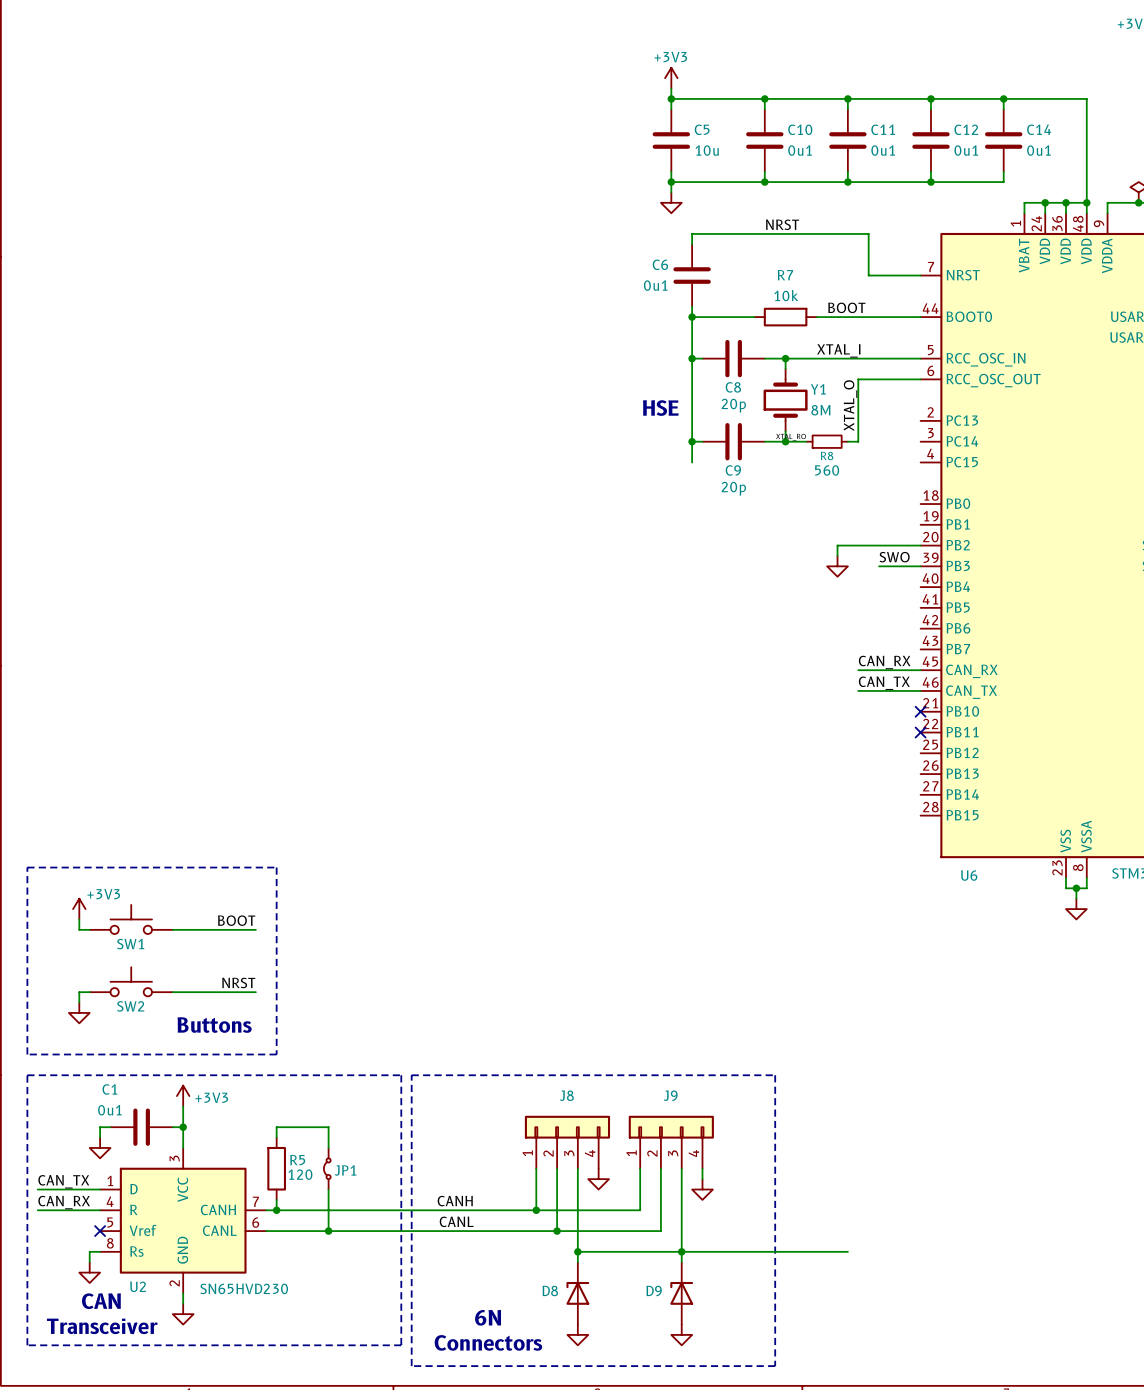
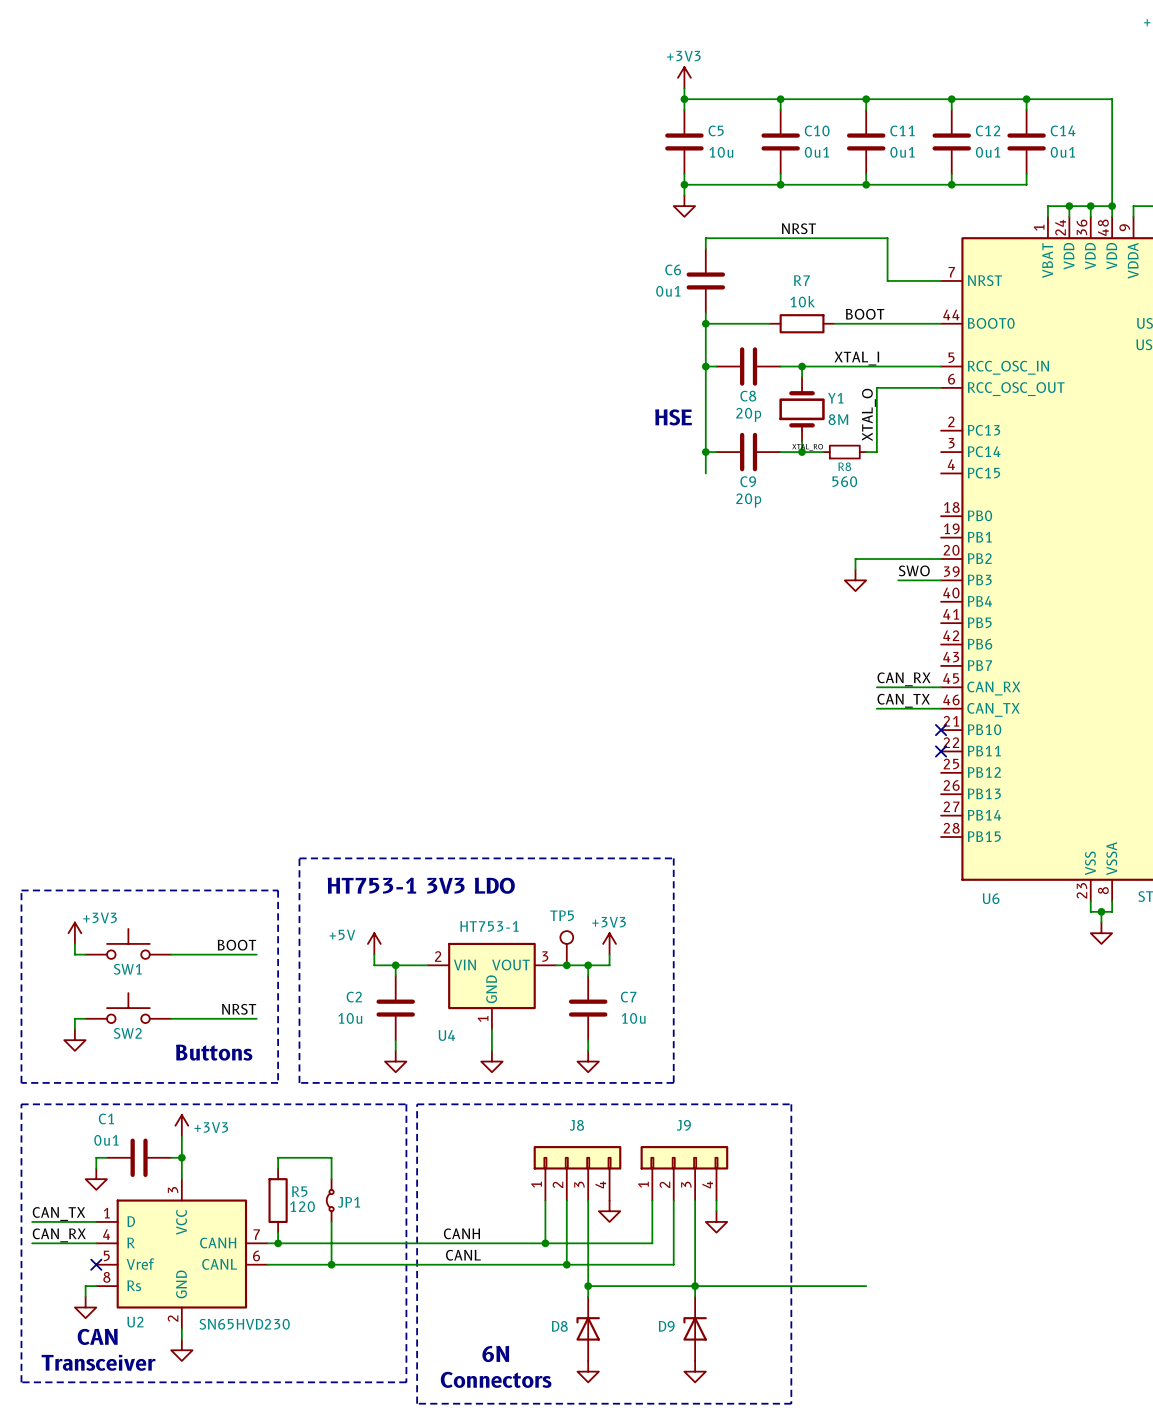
line: none -> (299, 858) (673, 858) (673, 1082) (299, 1082) (299, 858)
text: none -> HT753-1 3V3 LDO (421, 885)
power symbol: none -> +5V (374, 943)
power symbol: none -> +3V3 (609, 943)
TP5: none -> (566, 948)
wire: none -> (374, 954) (374, 965) (427, 965)
wire: none -> (609, 954) (609, 965) (556, 965)
wire: none -> (395, 965) (395, 976)
junction: none -> (395, 965)
junction: none -> (566, 965)
wire: none -> (588, 965) (588, 976)
junction: none -> (588, 965)
U4: none -> HT753-1 (491, 986)
C2: none -> 10u (395, 1008)
C7: none -> 10u (588, 1008)
wire: none -> (491, 1029) (491, 1050)
wire: none -> (395, 1040) (395, 1050)
wire: none -> (588, 1040) (588, 1050)
power symbol: none -> (395, 1061)
power symbol: none -> (491, 1061)
power symbol: none -> (588, 1061)

